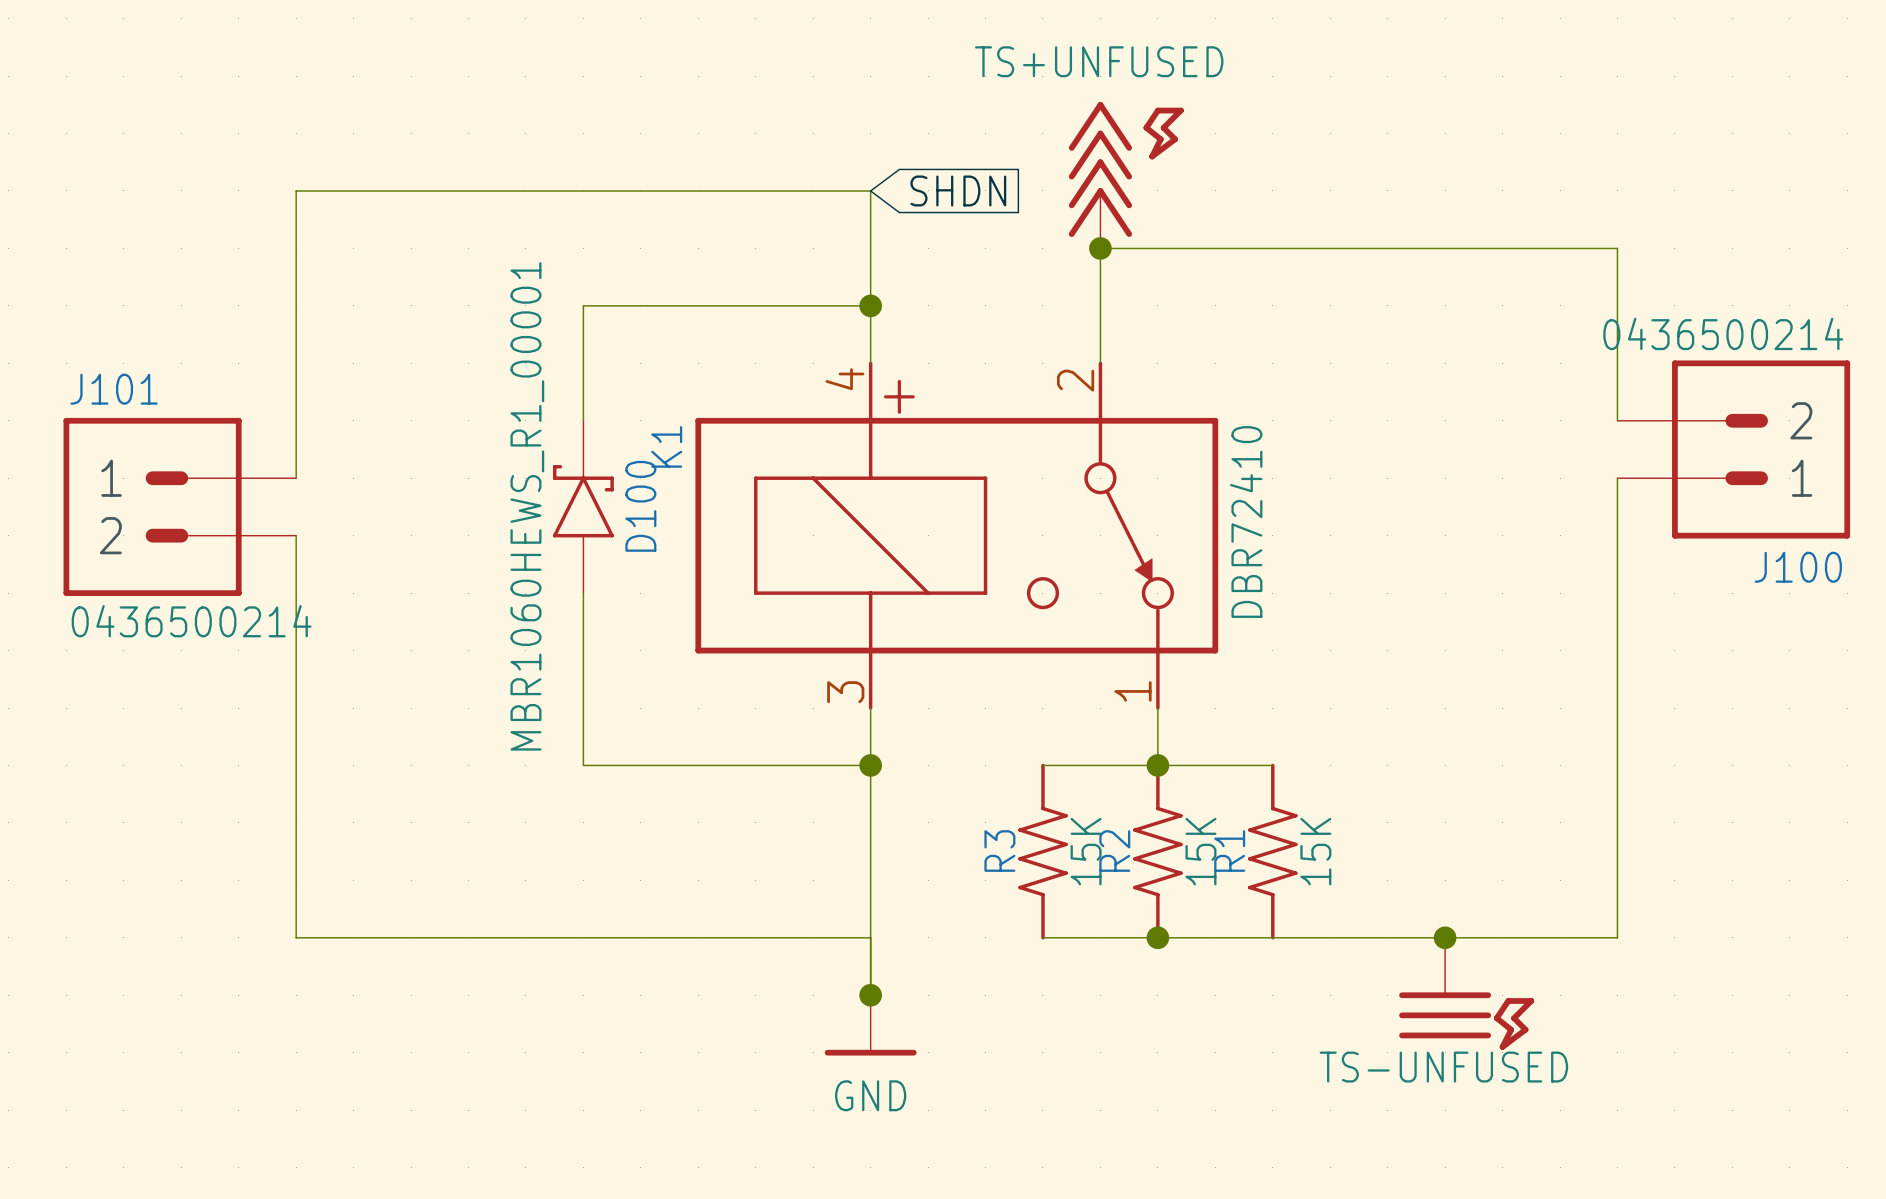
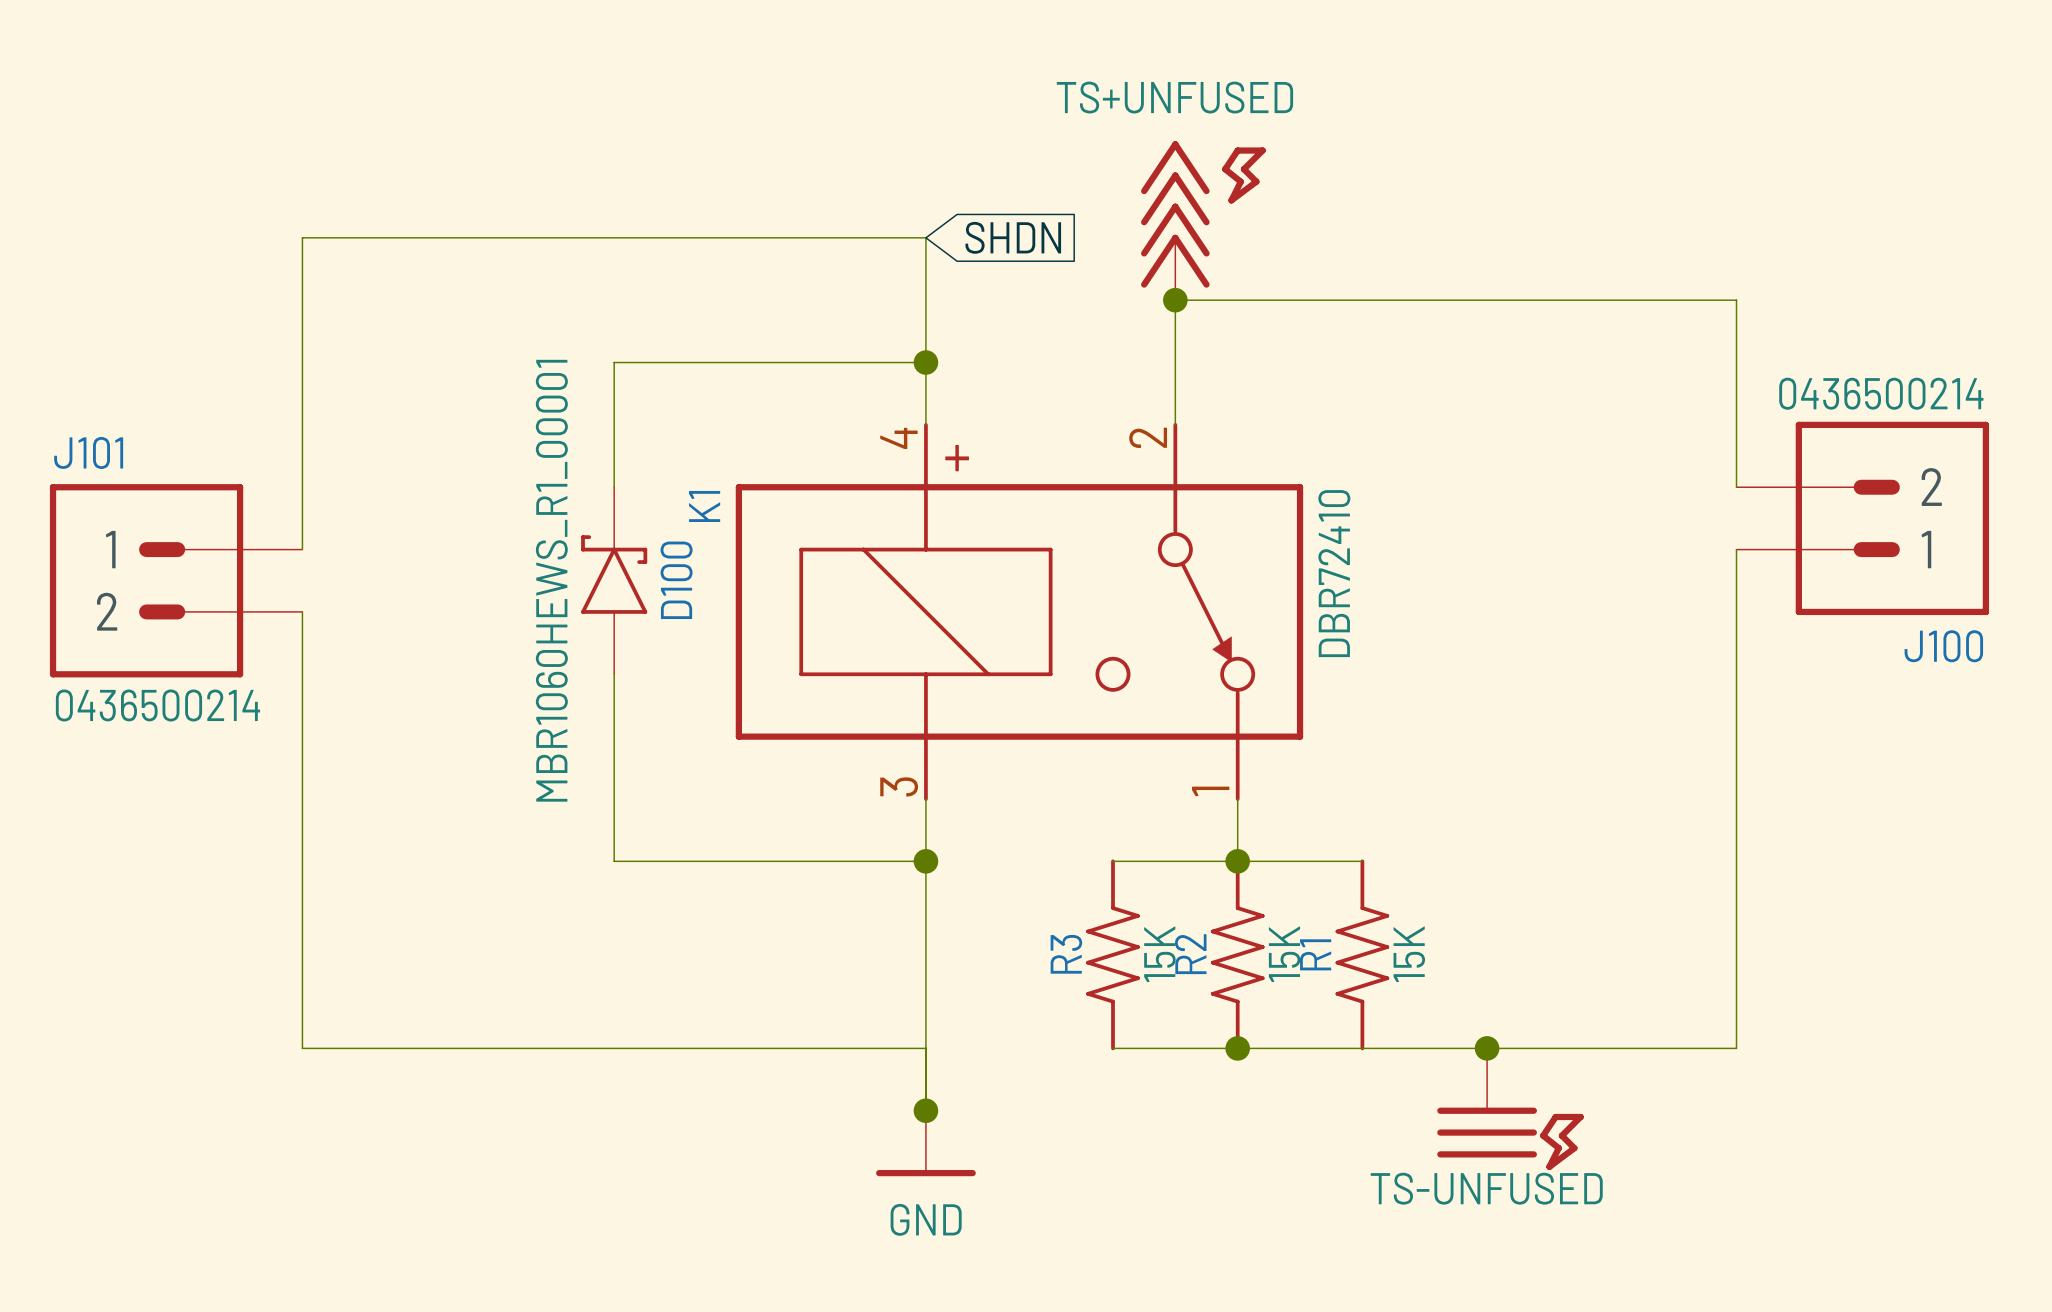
junction position: (1445, 937) -> (1487, 1048)
power symbol position: TS-UNFUSED (1466, 993) -> TS-UNFUSED (1510, 1109)

